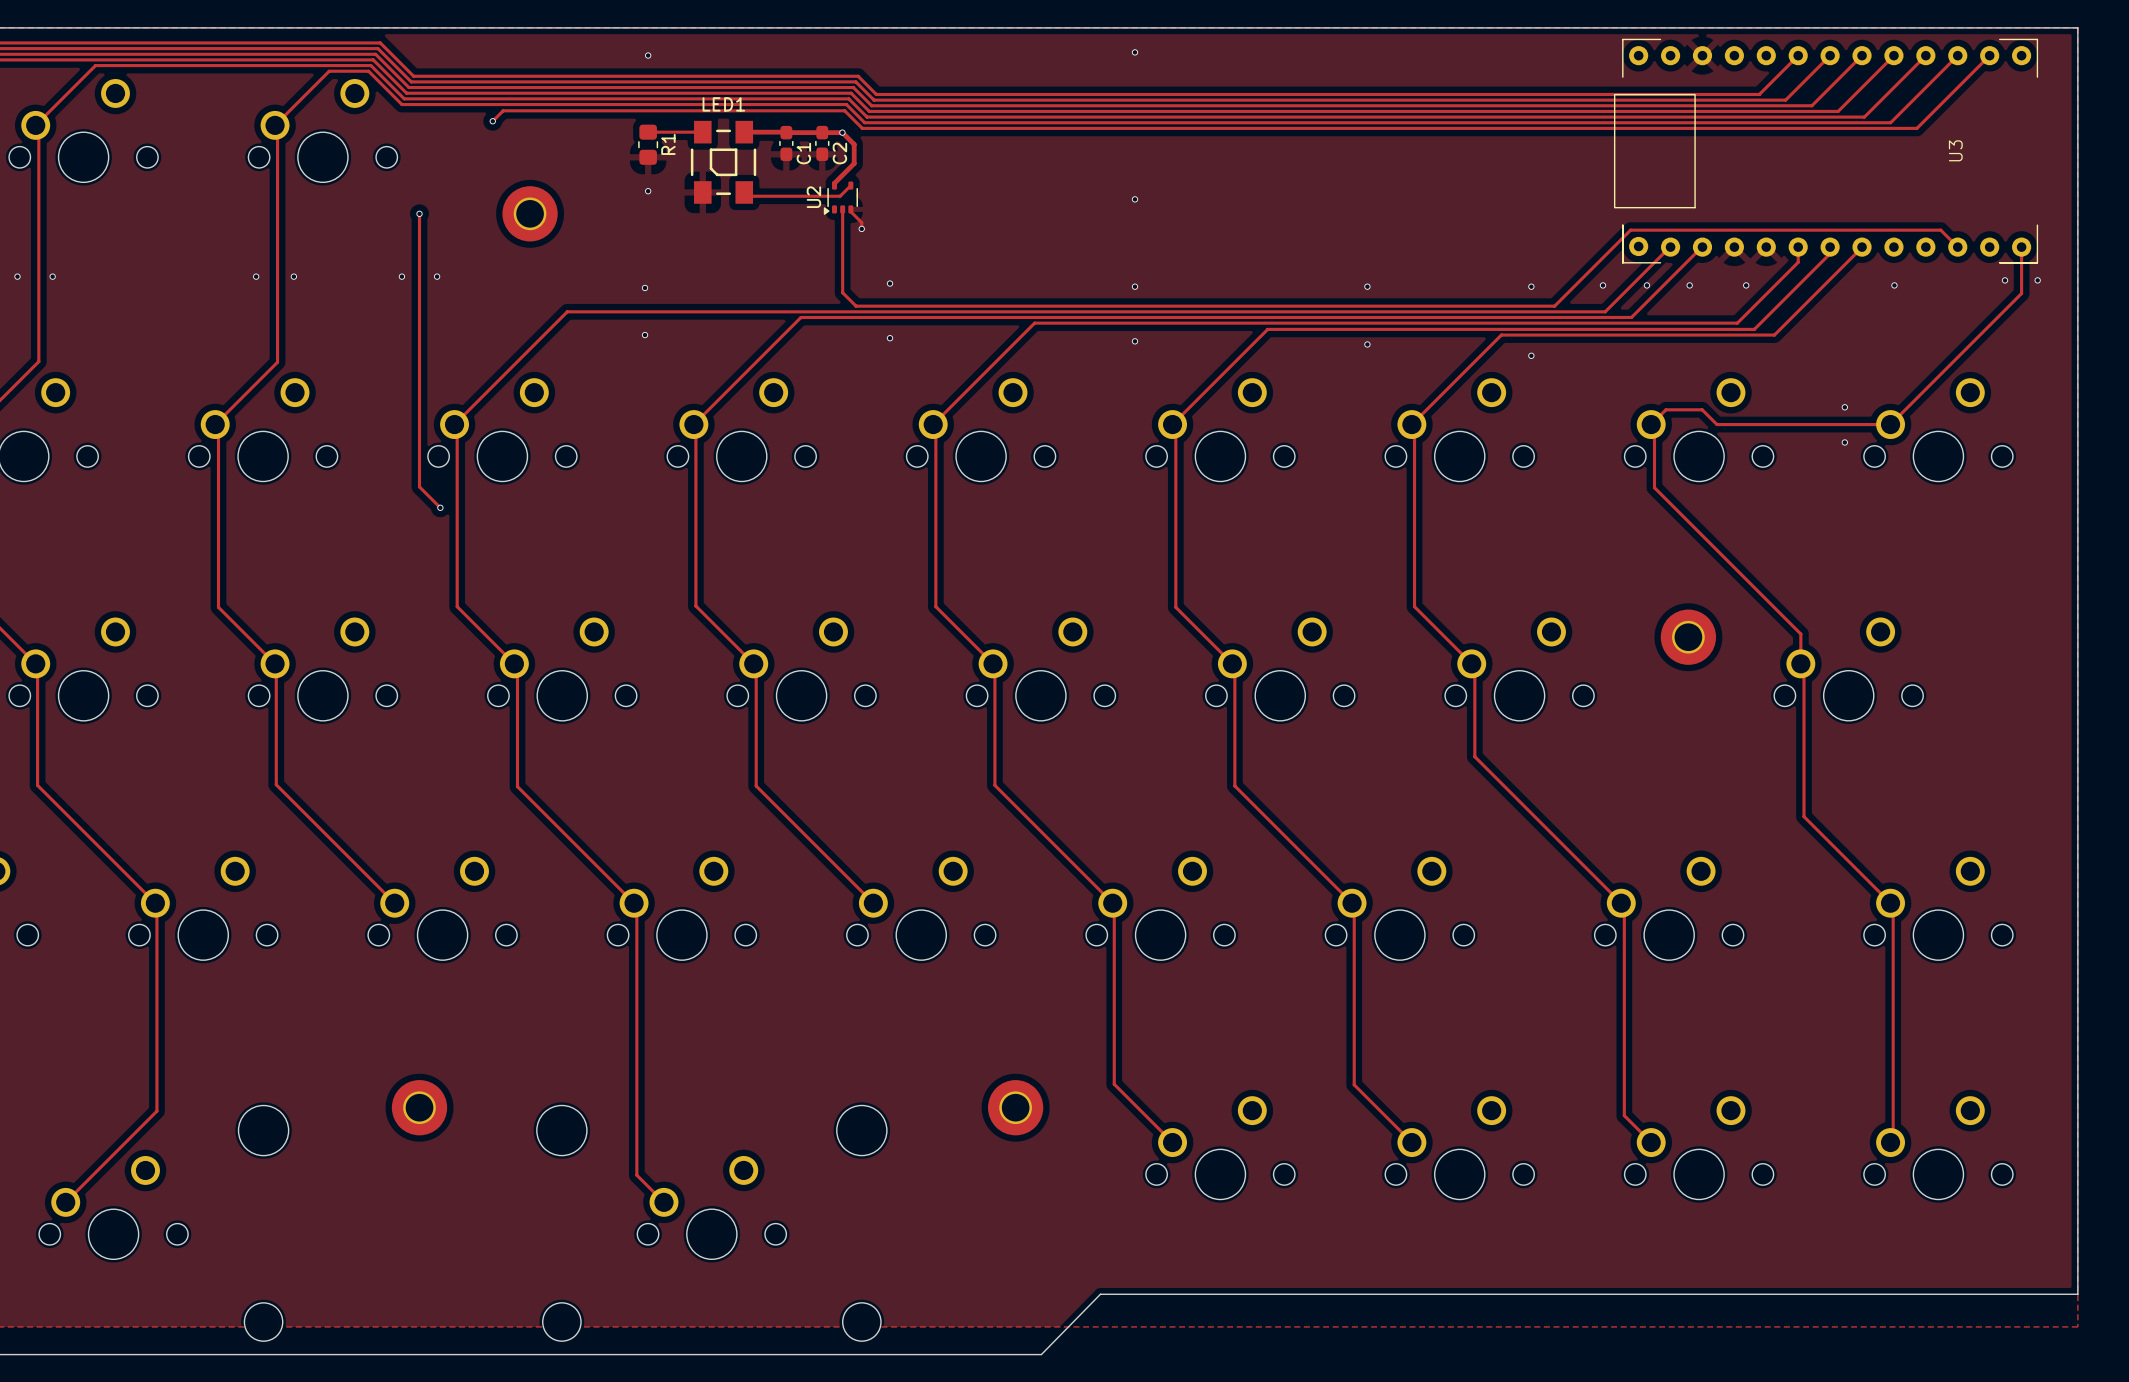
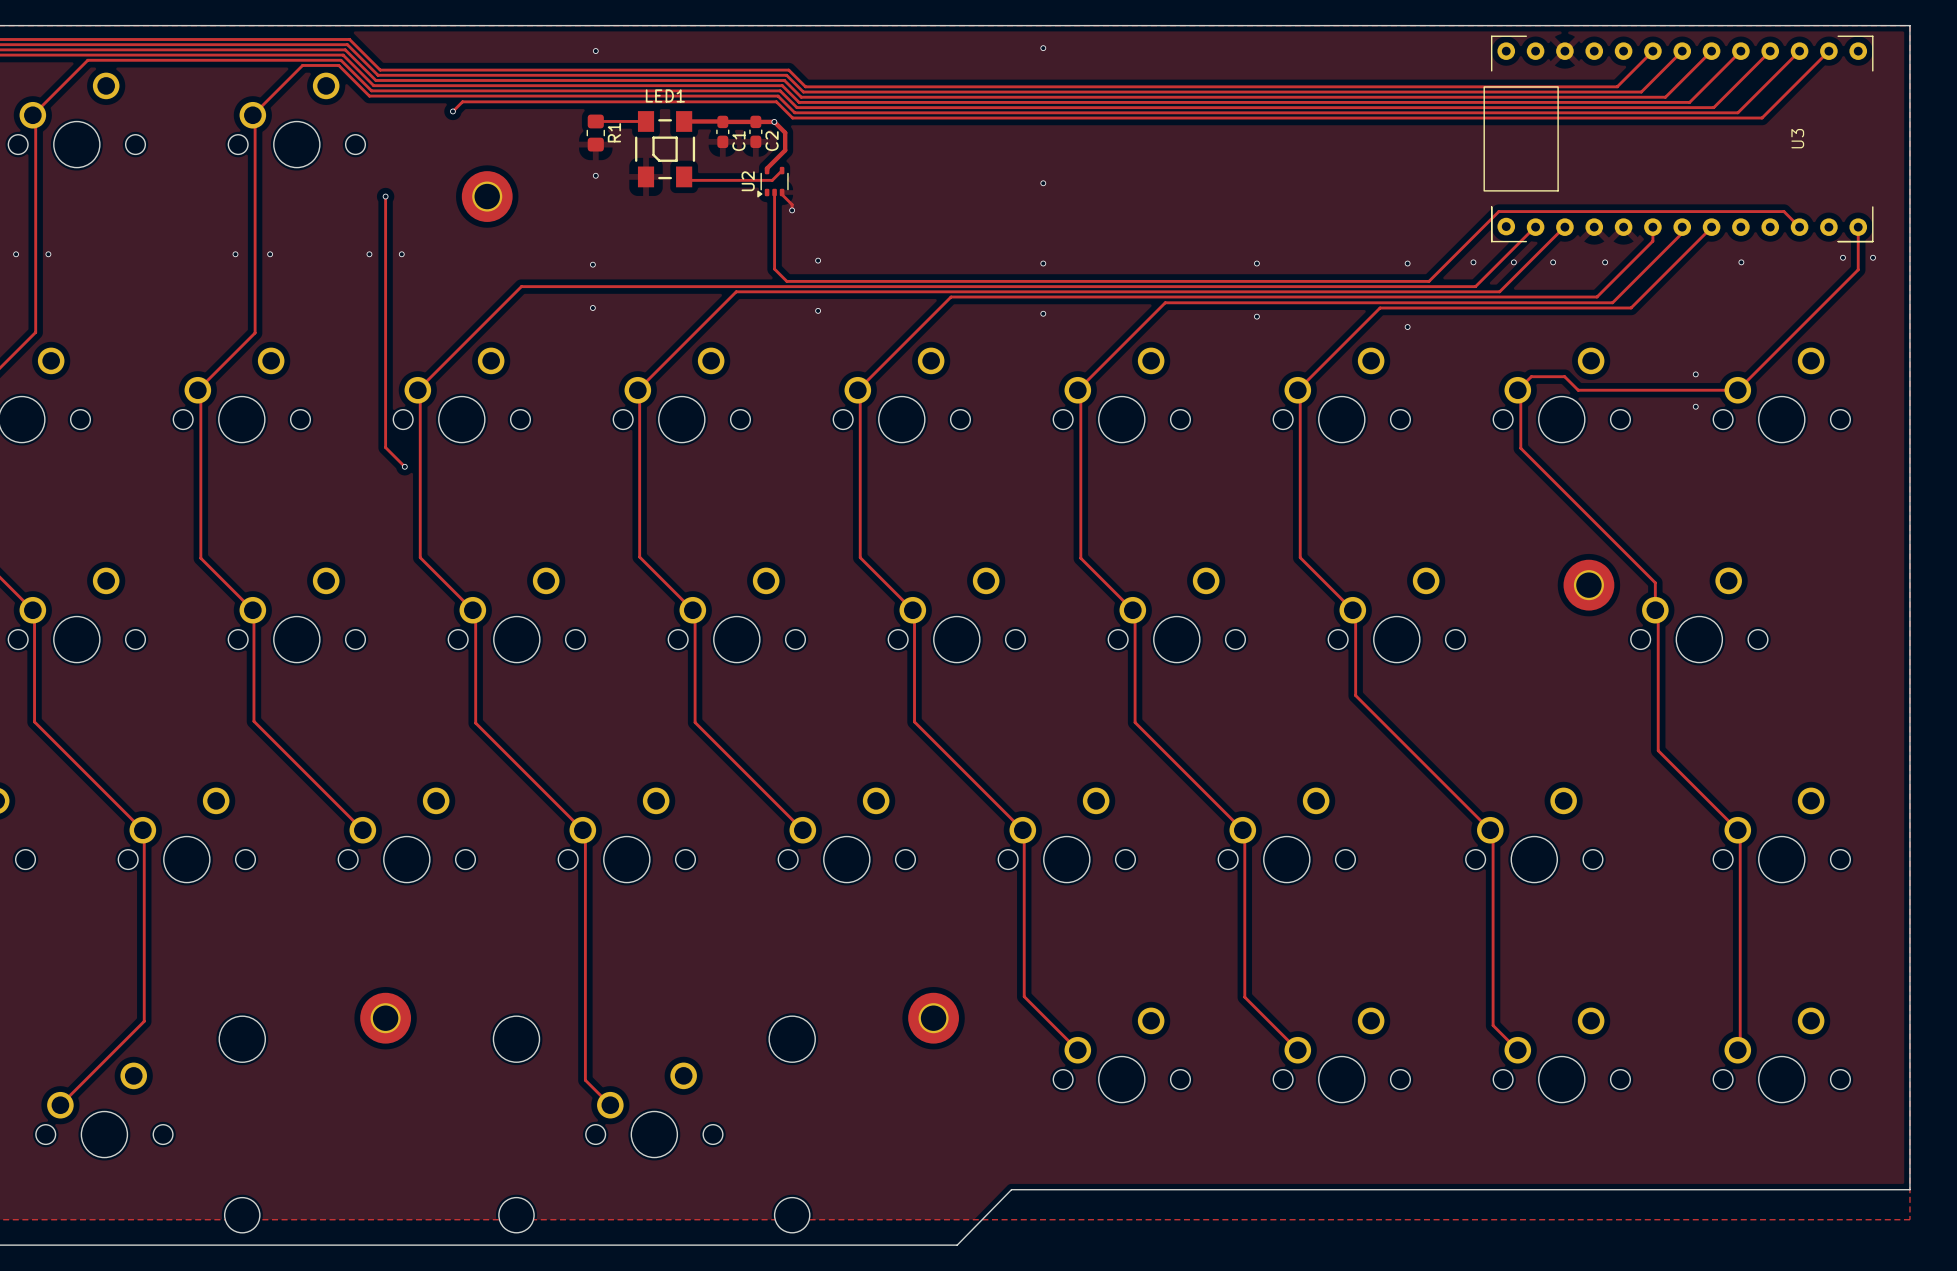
part position: (1688, 637) -> (1588, 585)

